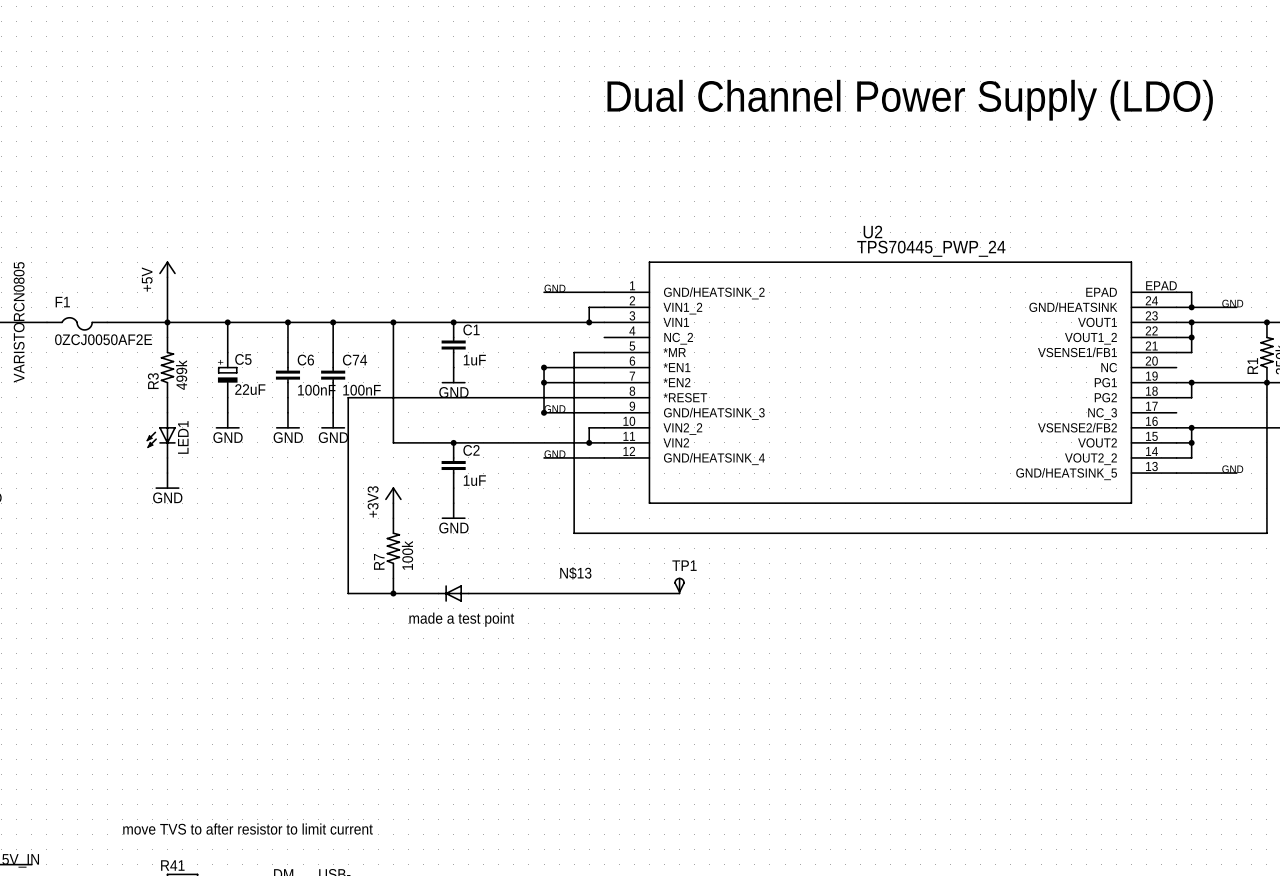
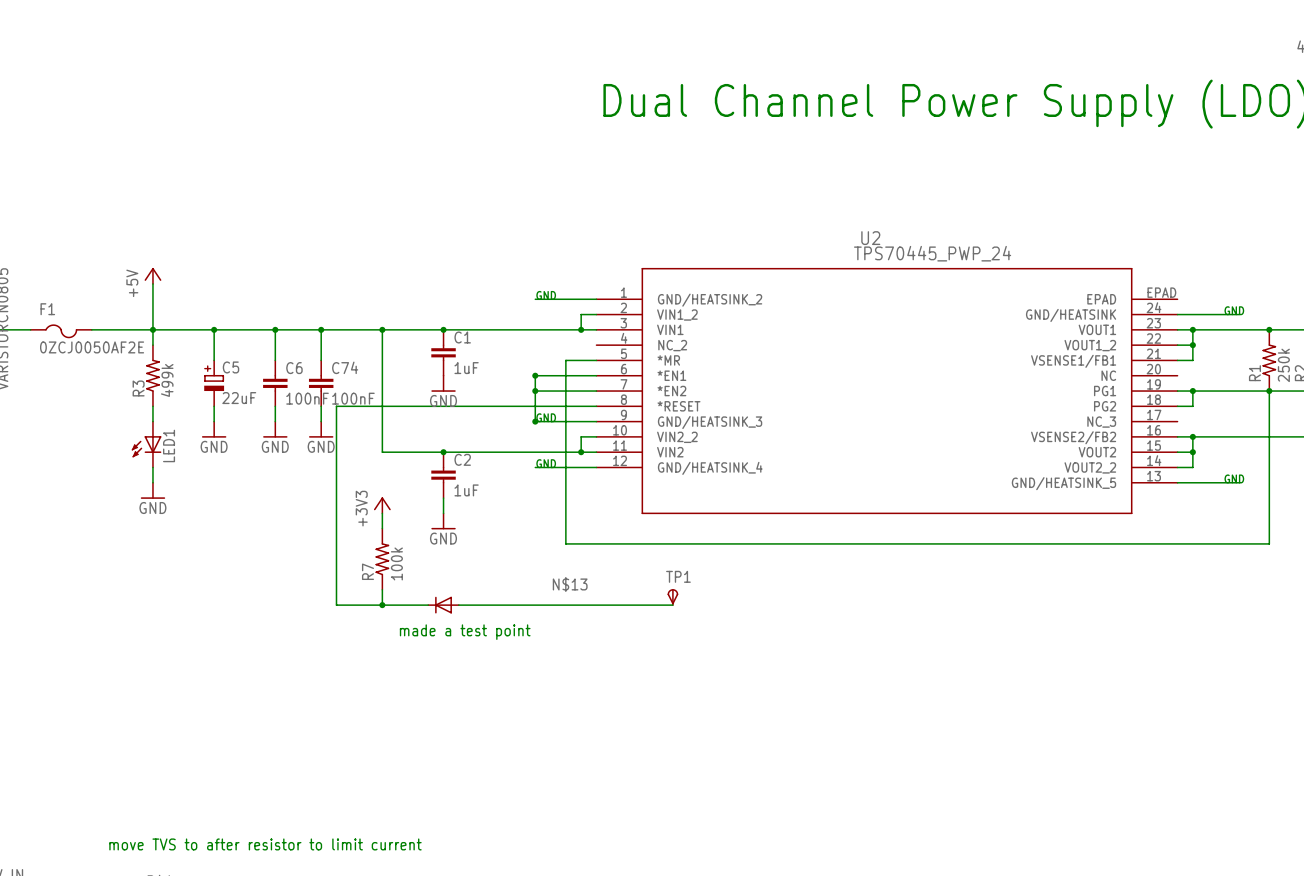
wire: (1176, 292) (1191, 292) (1191, 307) -> none
junction: (1191, 307) -> none

